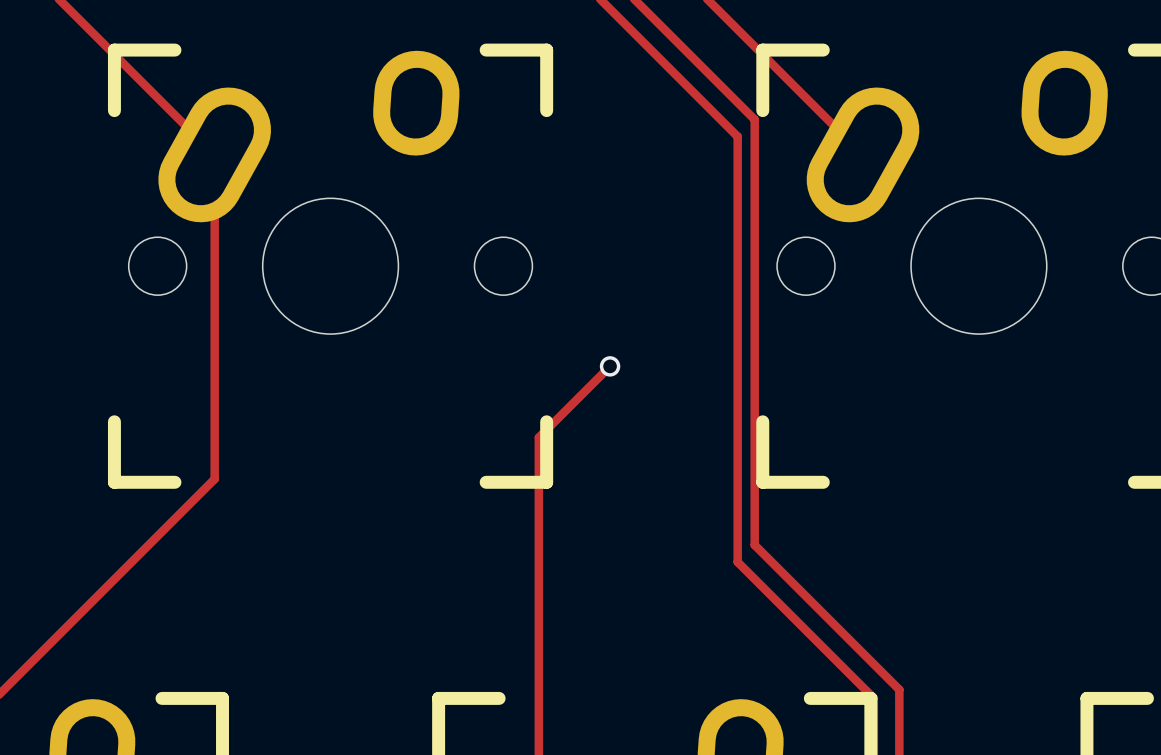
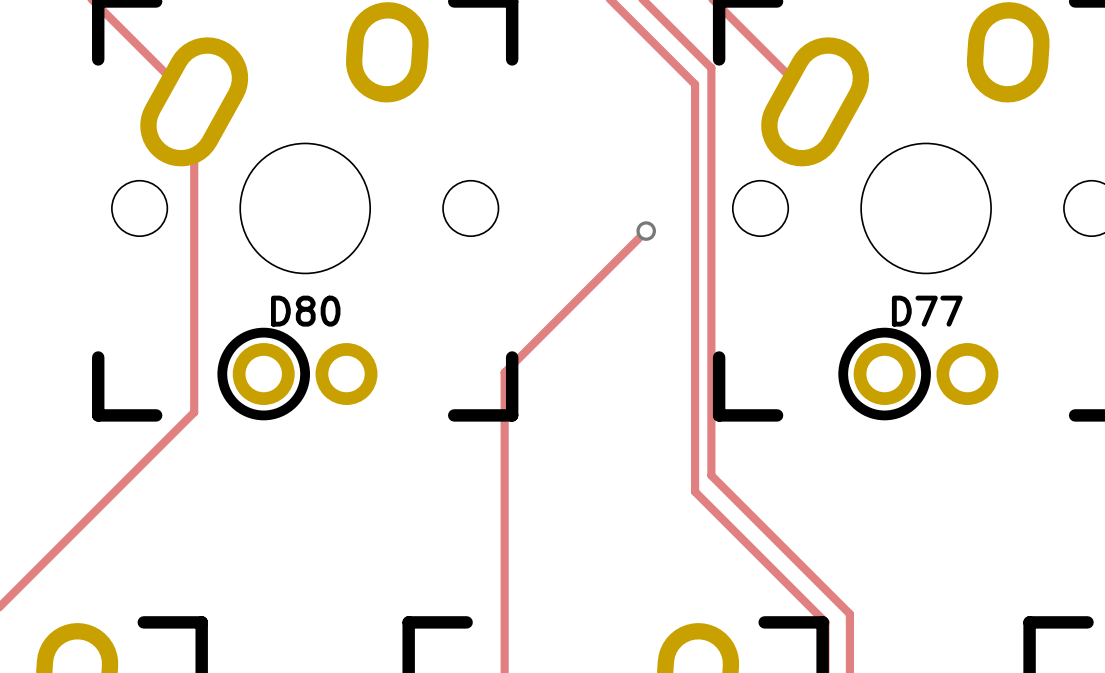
track: none -> (646, 231) (572, 304)
via position: (610, 366) -> (646, 231)
D80: none -> (297, 374)
D77: none -> (918, 374)

